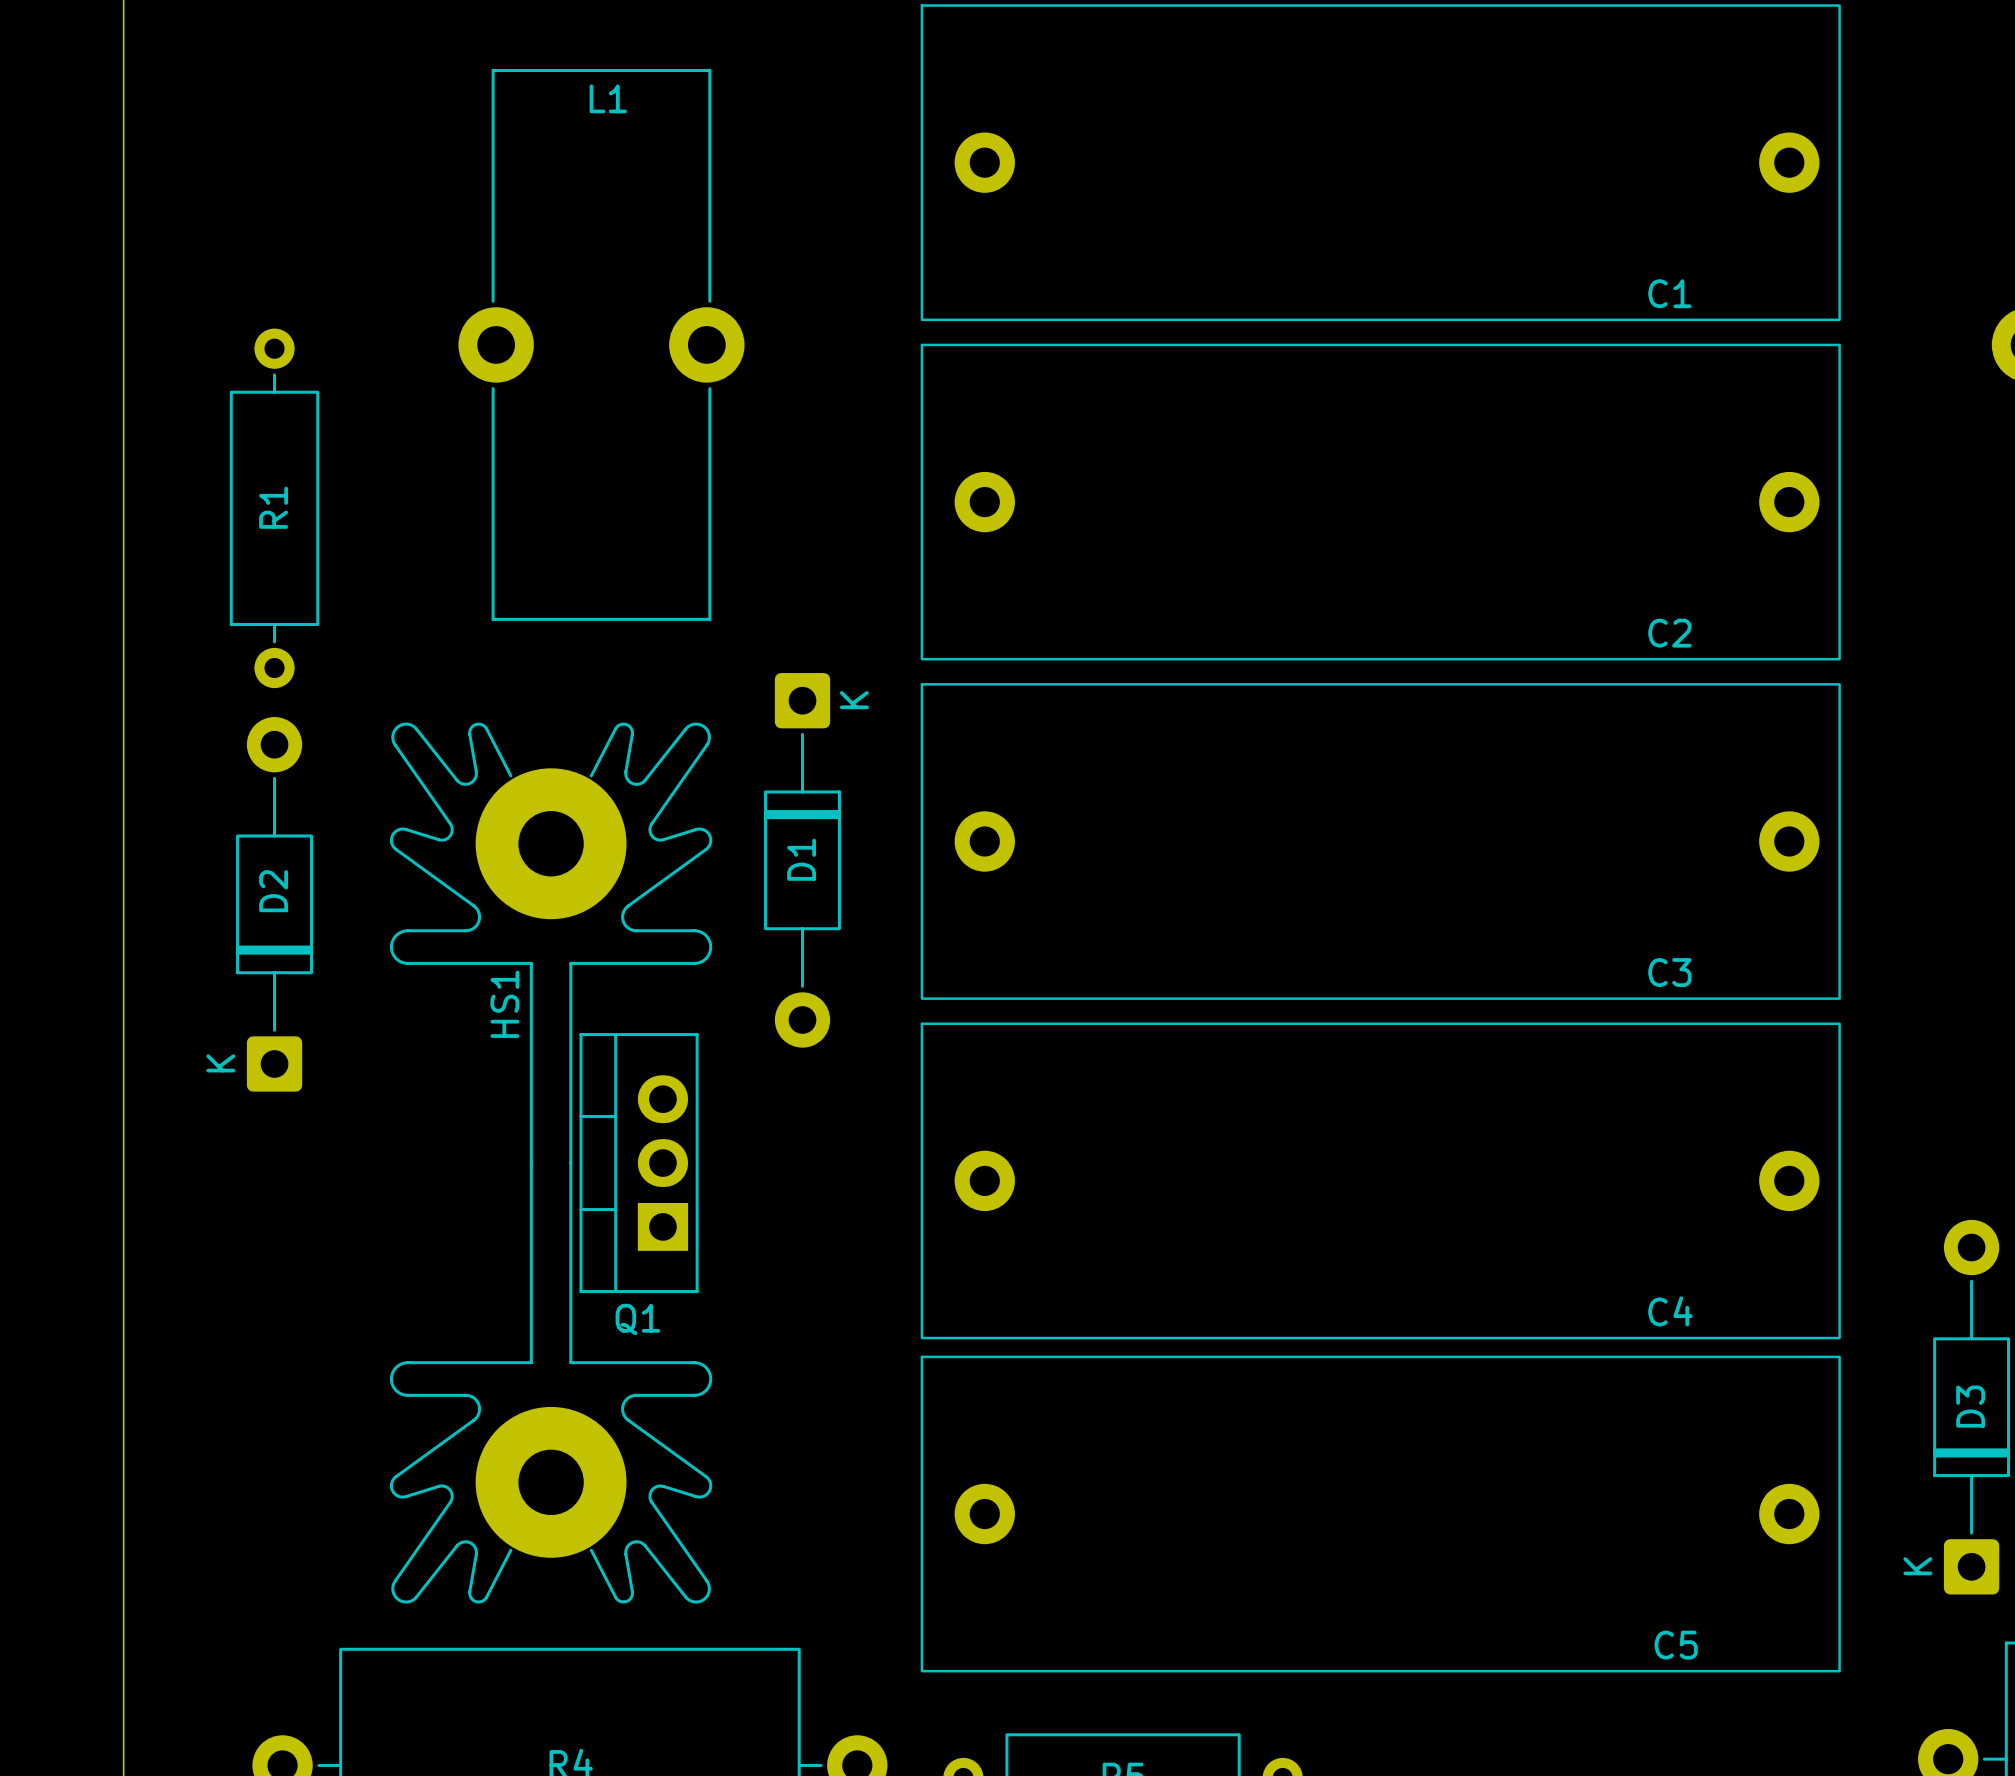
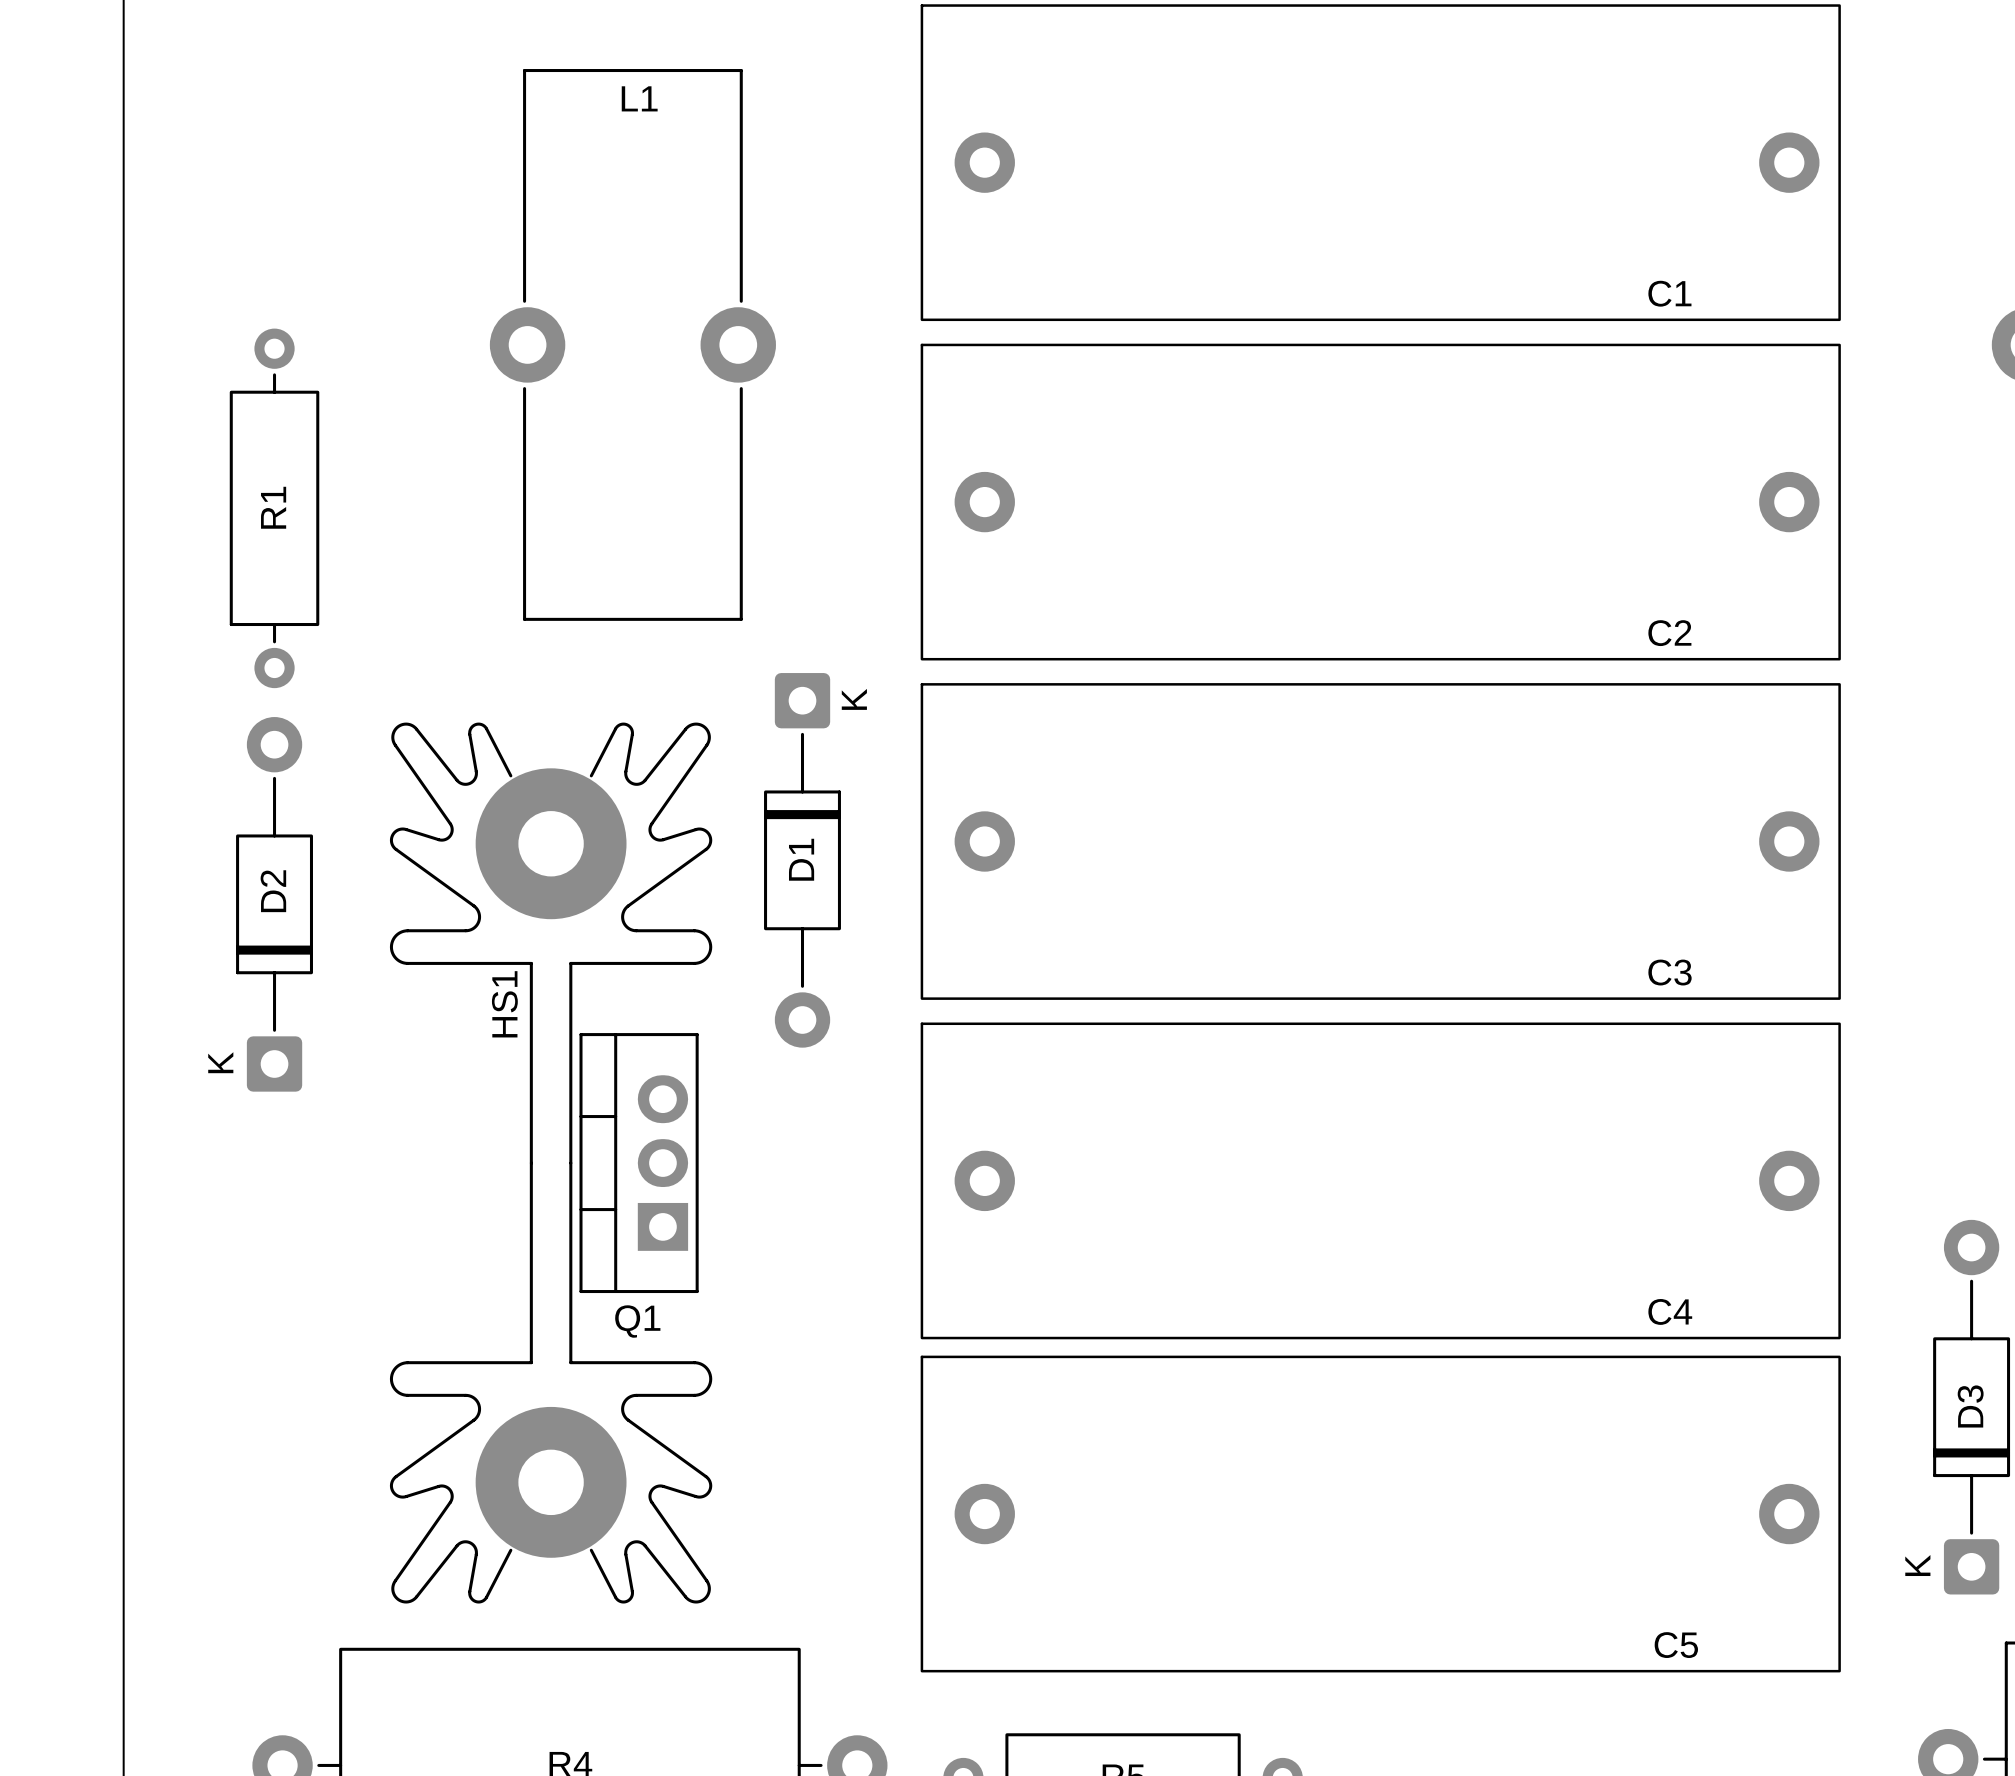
L1 position: (601, 344) -> (632, 344)

